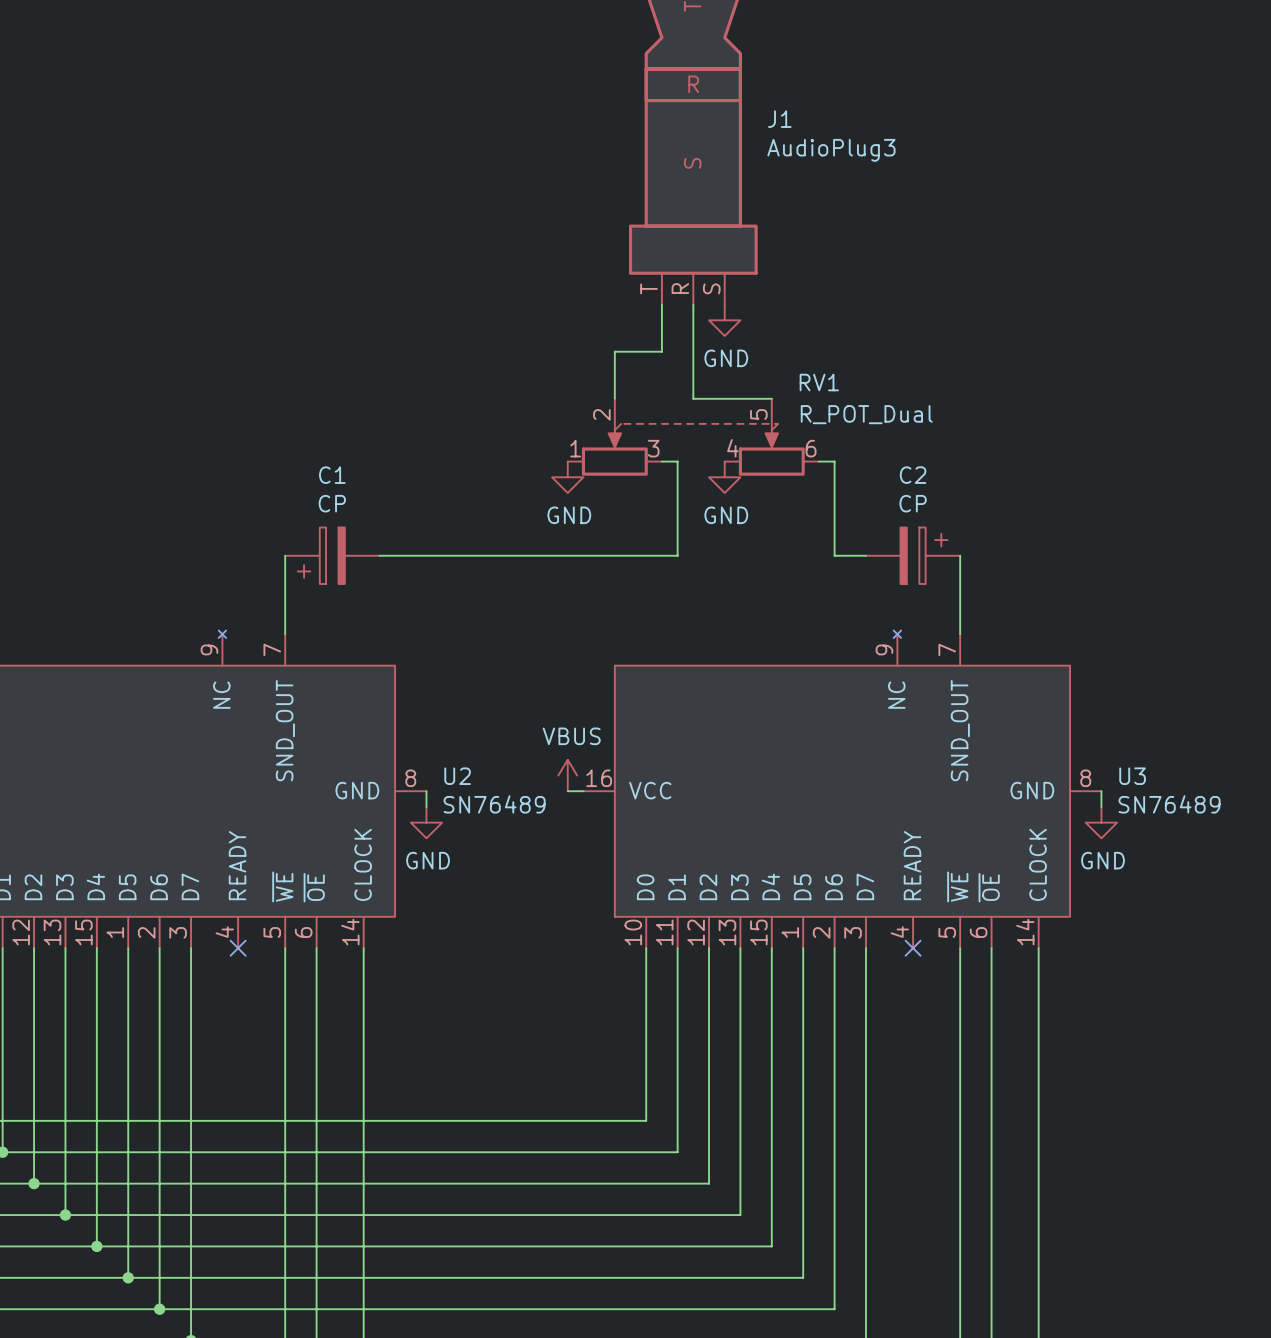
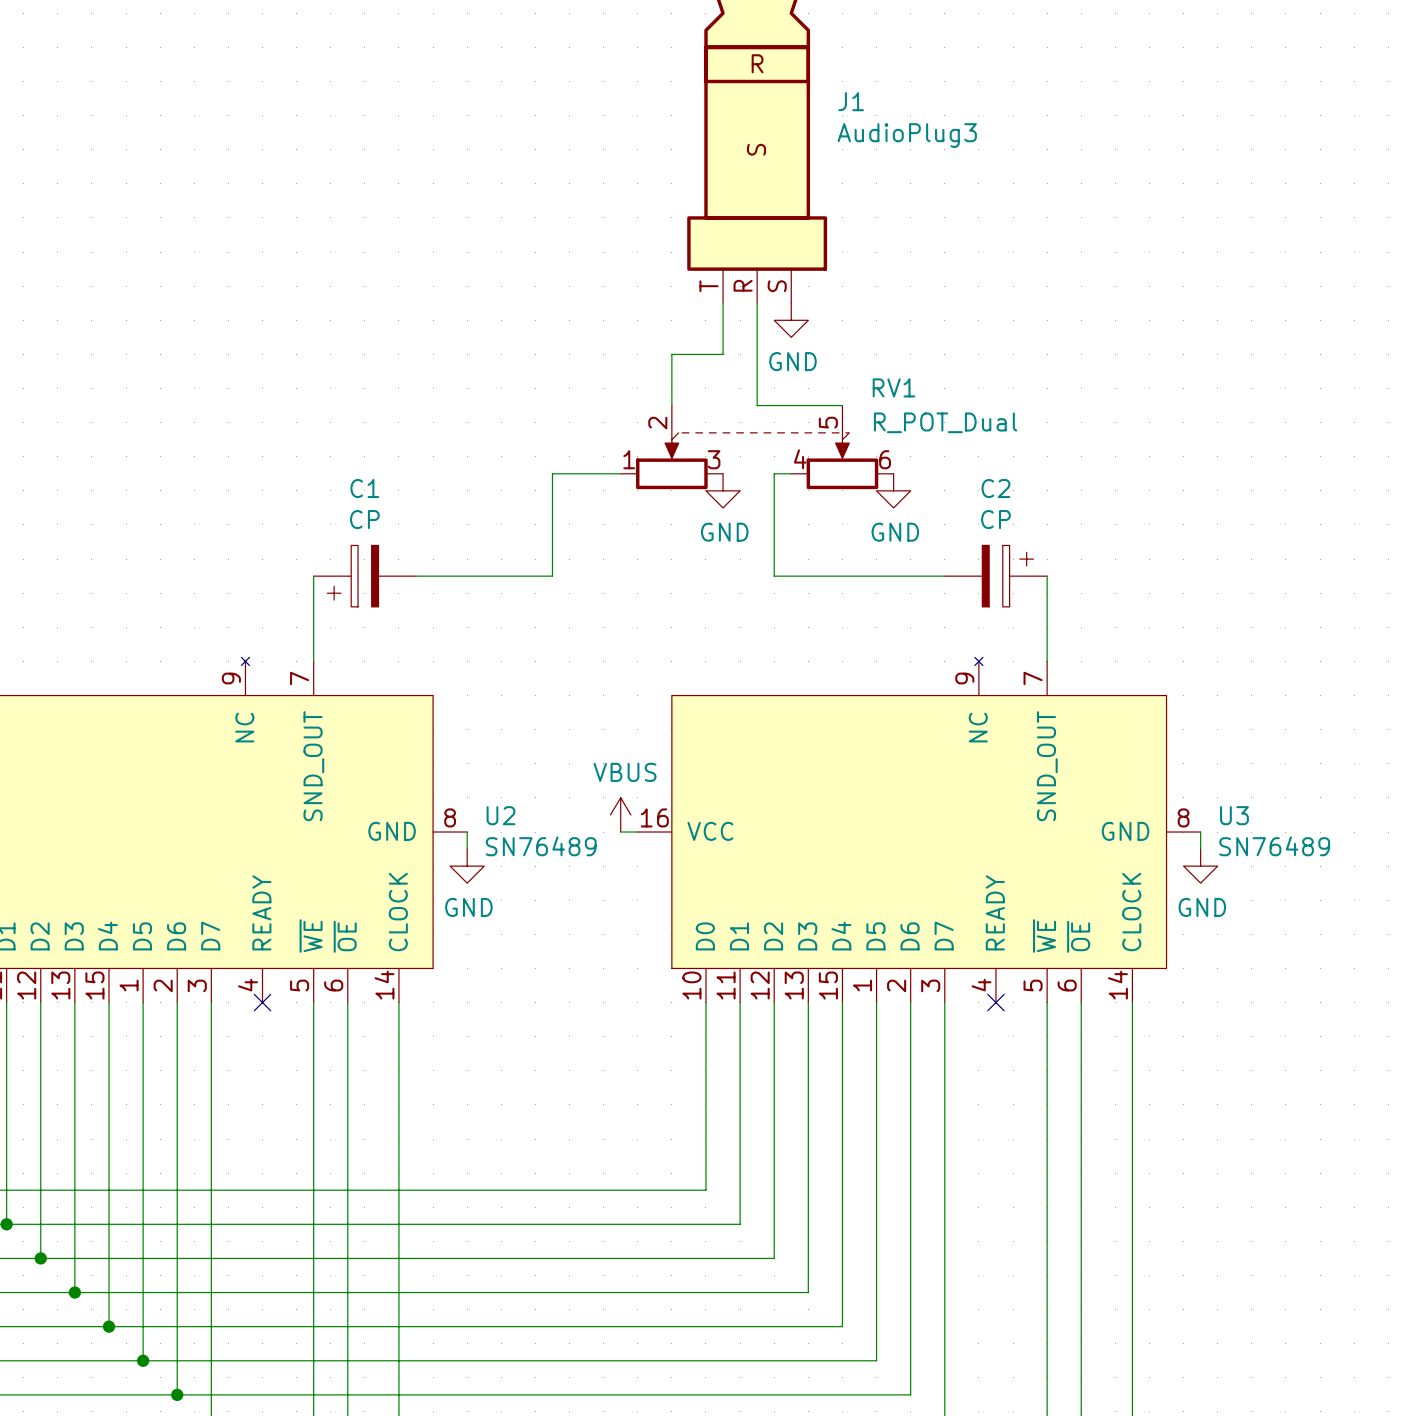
wire: (661, 461) (677, 461) (677, 555) (504, 555) -> (620, 473) (552, 473) (552, 576)
wire: (818, 461) (834, 461) (834, 555) -> (791, 473) (774, 473) (774, 576) (910, 576)
power symbol: GND (567, 477) -> none
power symbol: none -> GND (723, 490)
power symbol: GND (724, 477) -> none
power symbol: none -> GND (893, 490)

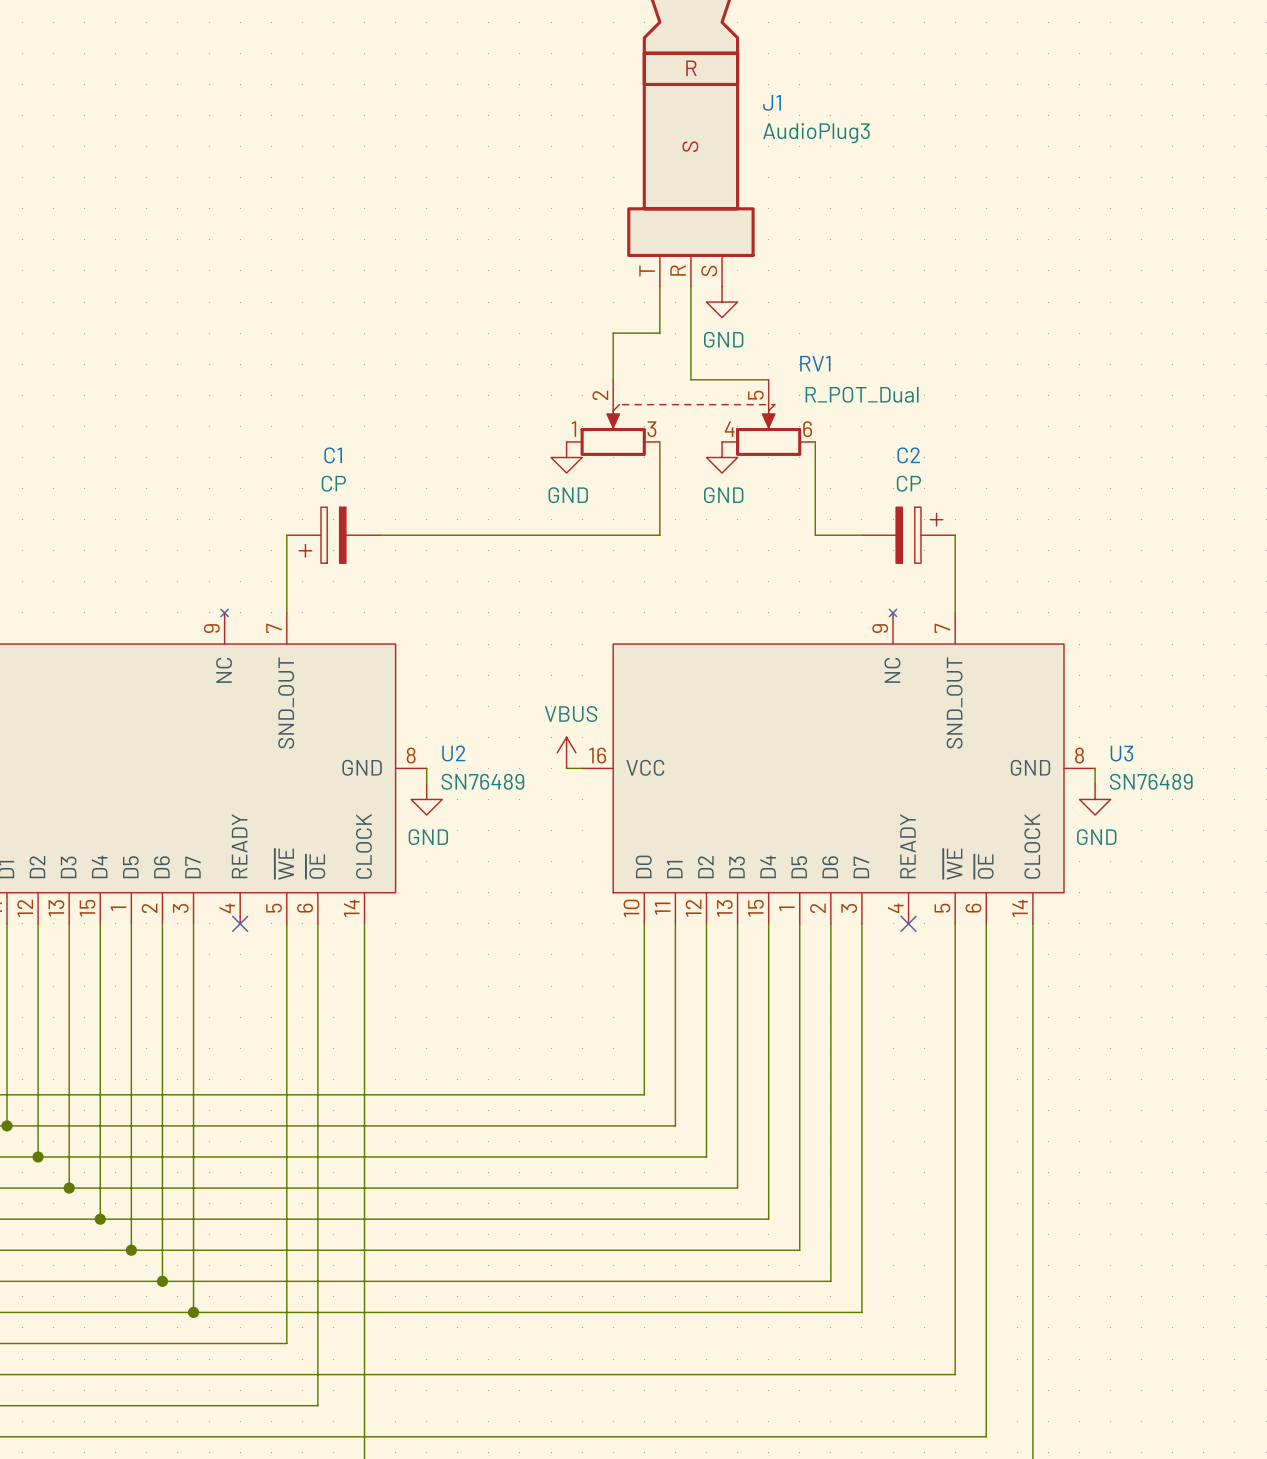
wire: (620, 473) (552, 473) (552, 576) -> (659, 441) (659, 535) (504, 535)
wire: (791, 473) (774, 473) (774, 576) (893, 576) -> (815, 441) (815, 535)
power symbol: none -> GND (566, 457)
power symbol: GND (723, 490) -> none
power symbol: none -> GND (722, 457)
power symbol: GND (893, 490) -> none

